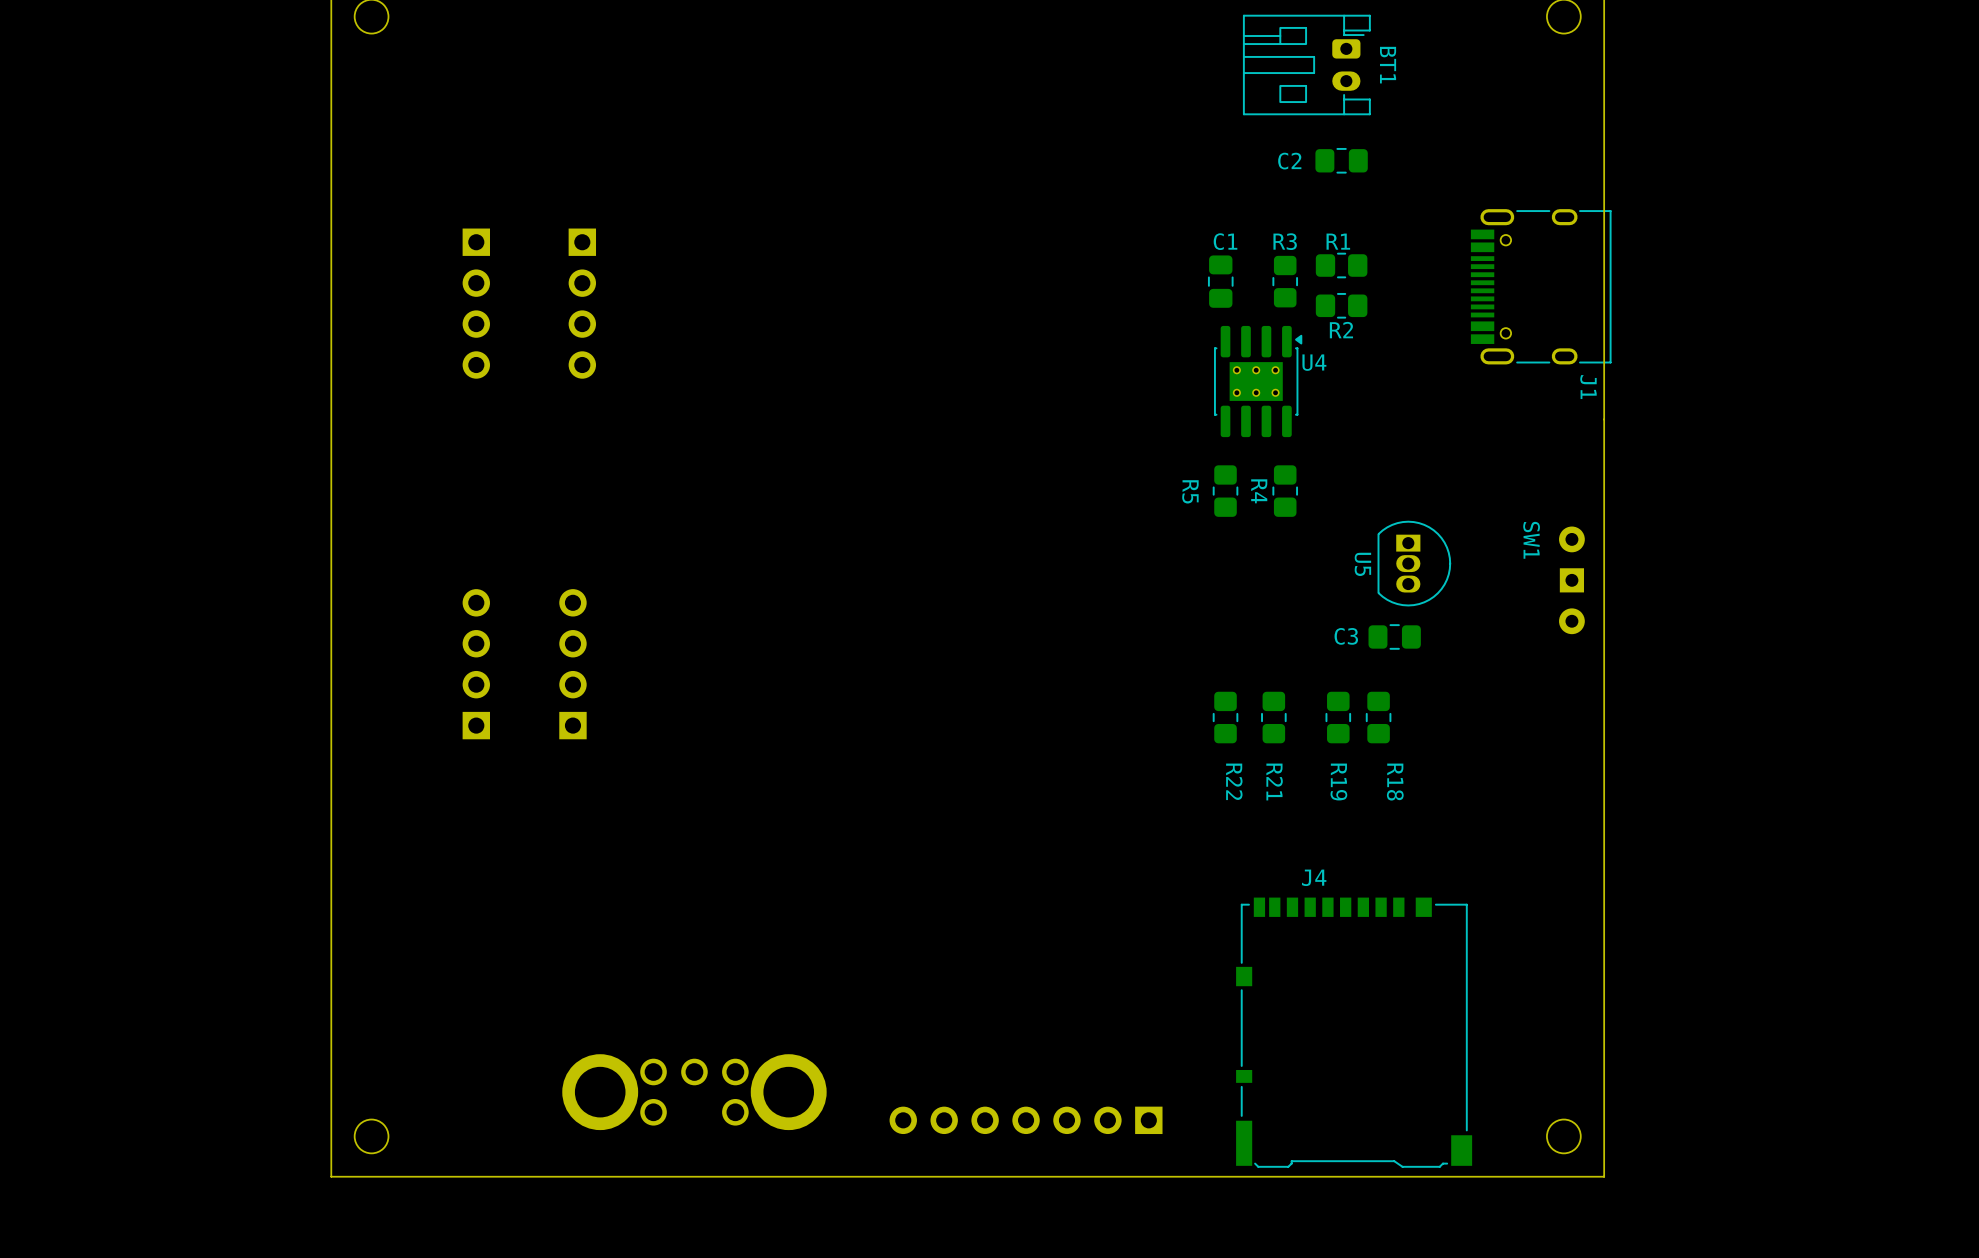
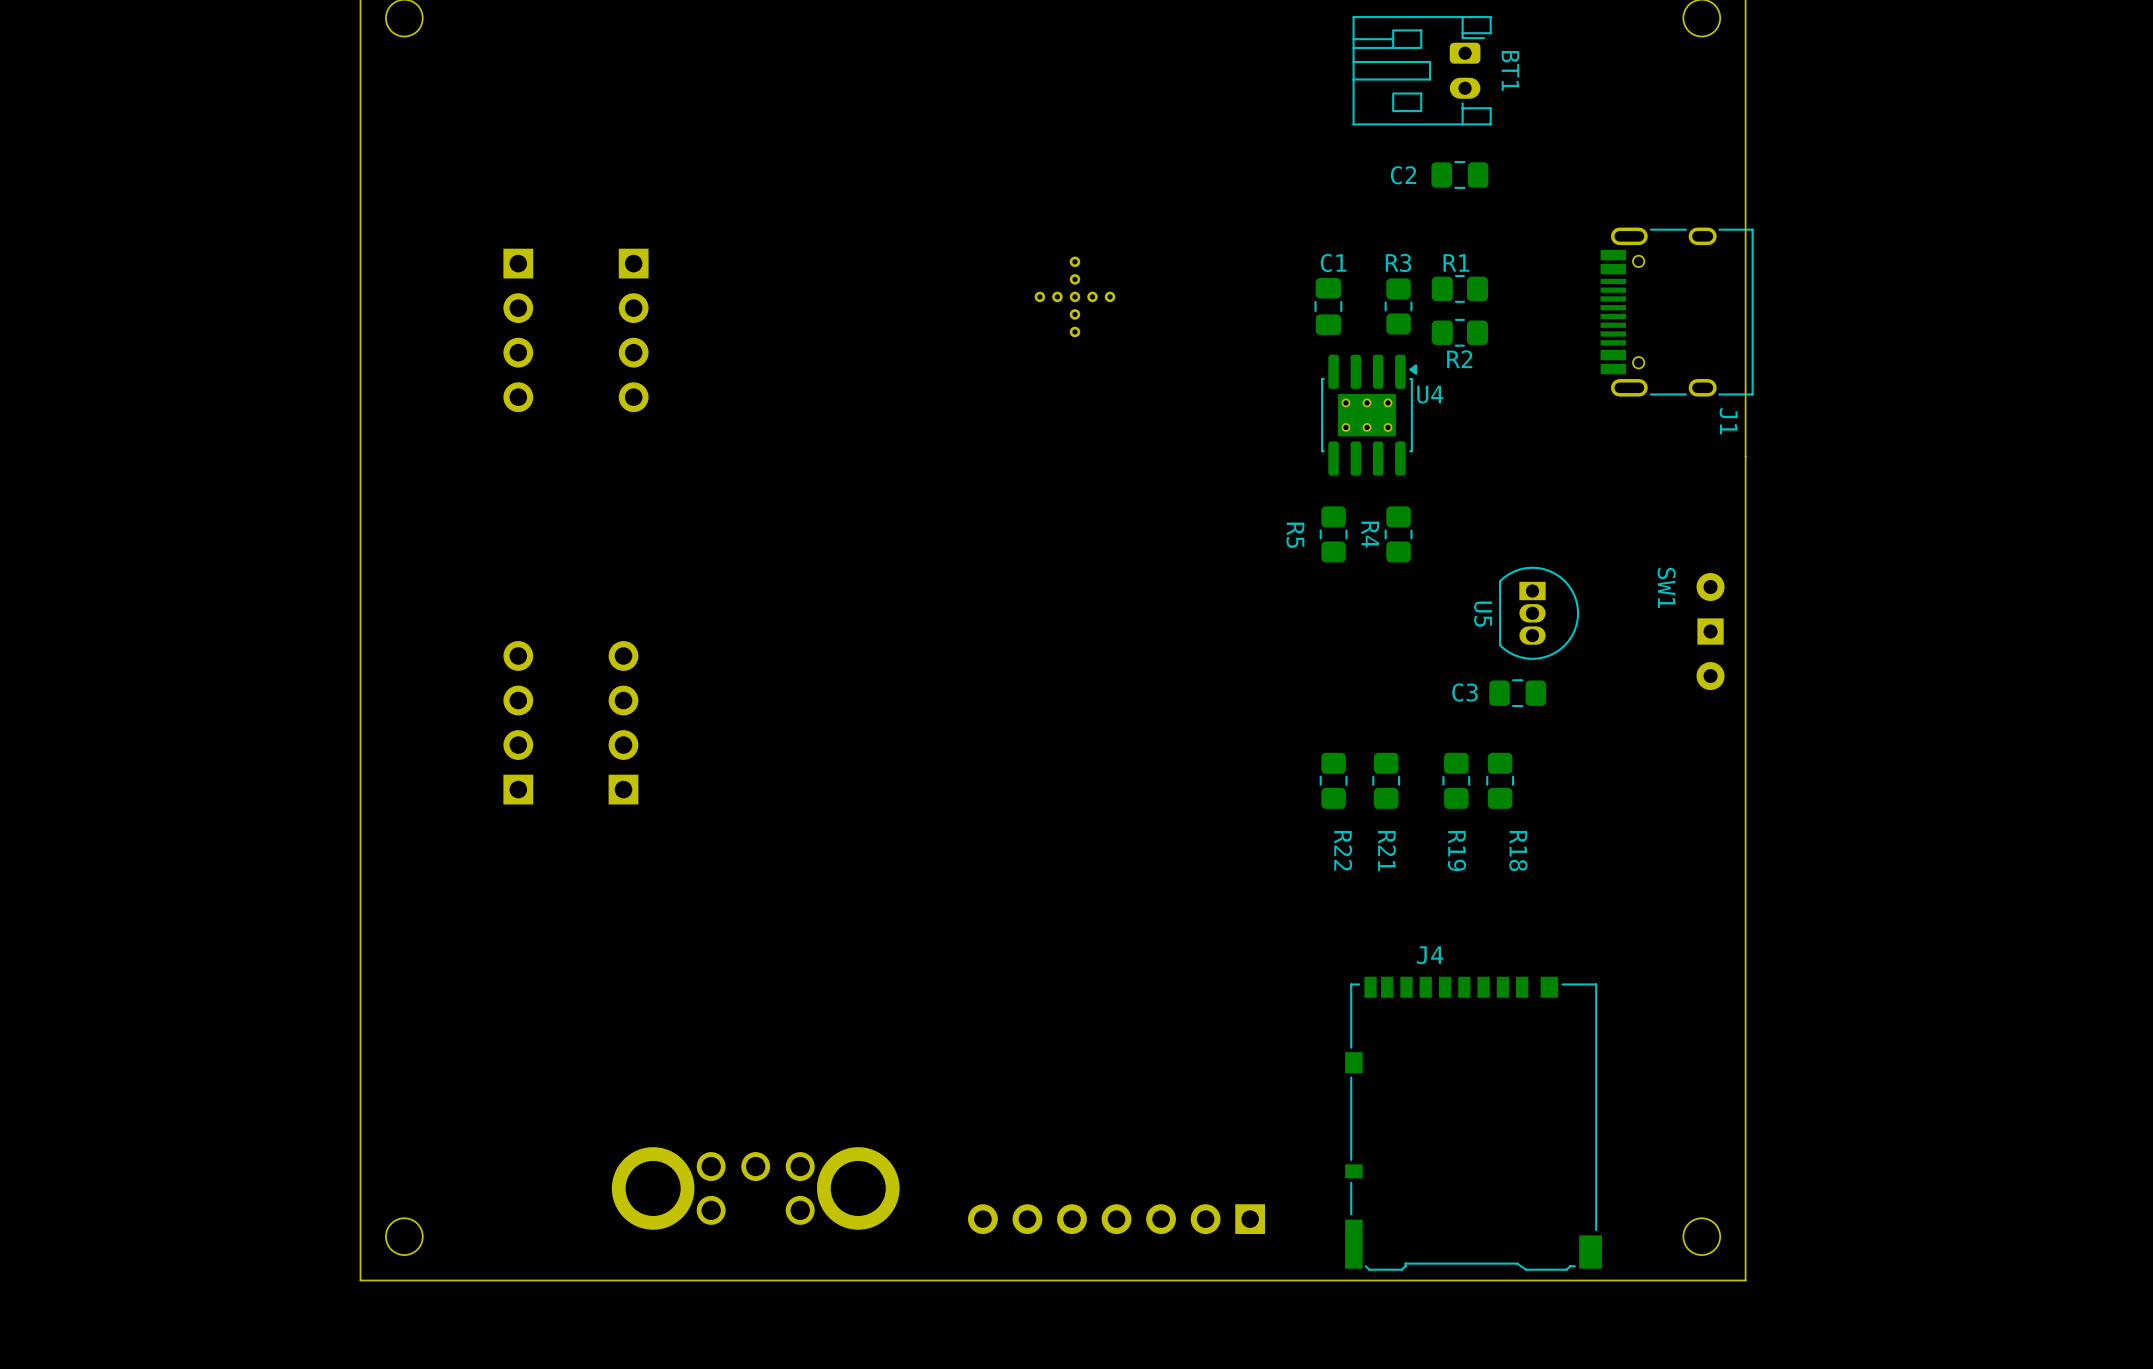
part: none -> (1074, 296)

